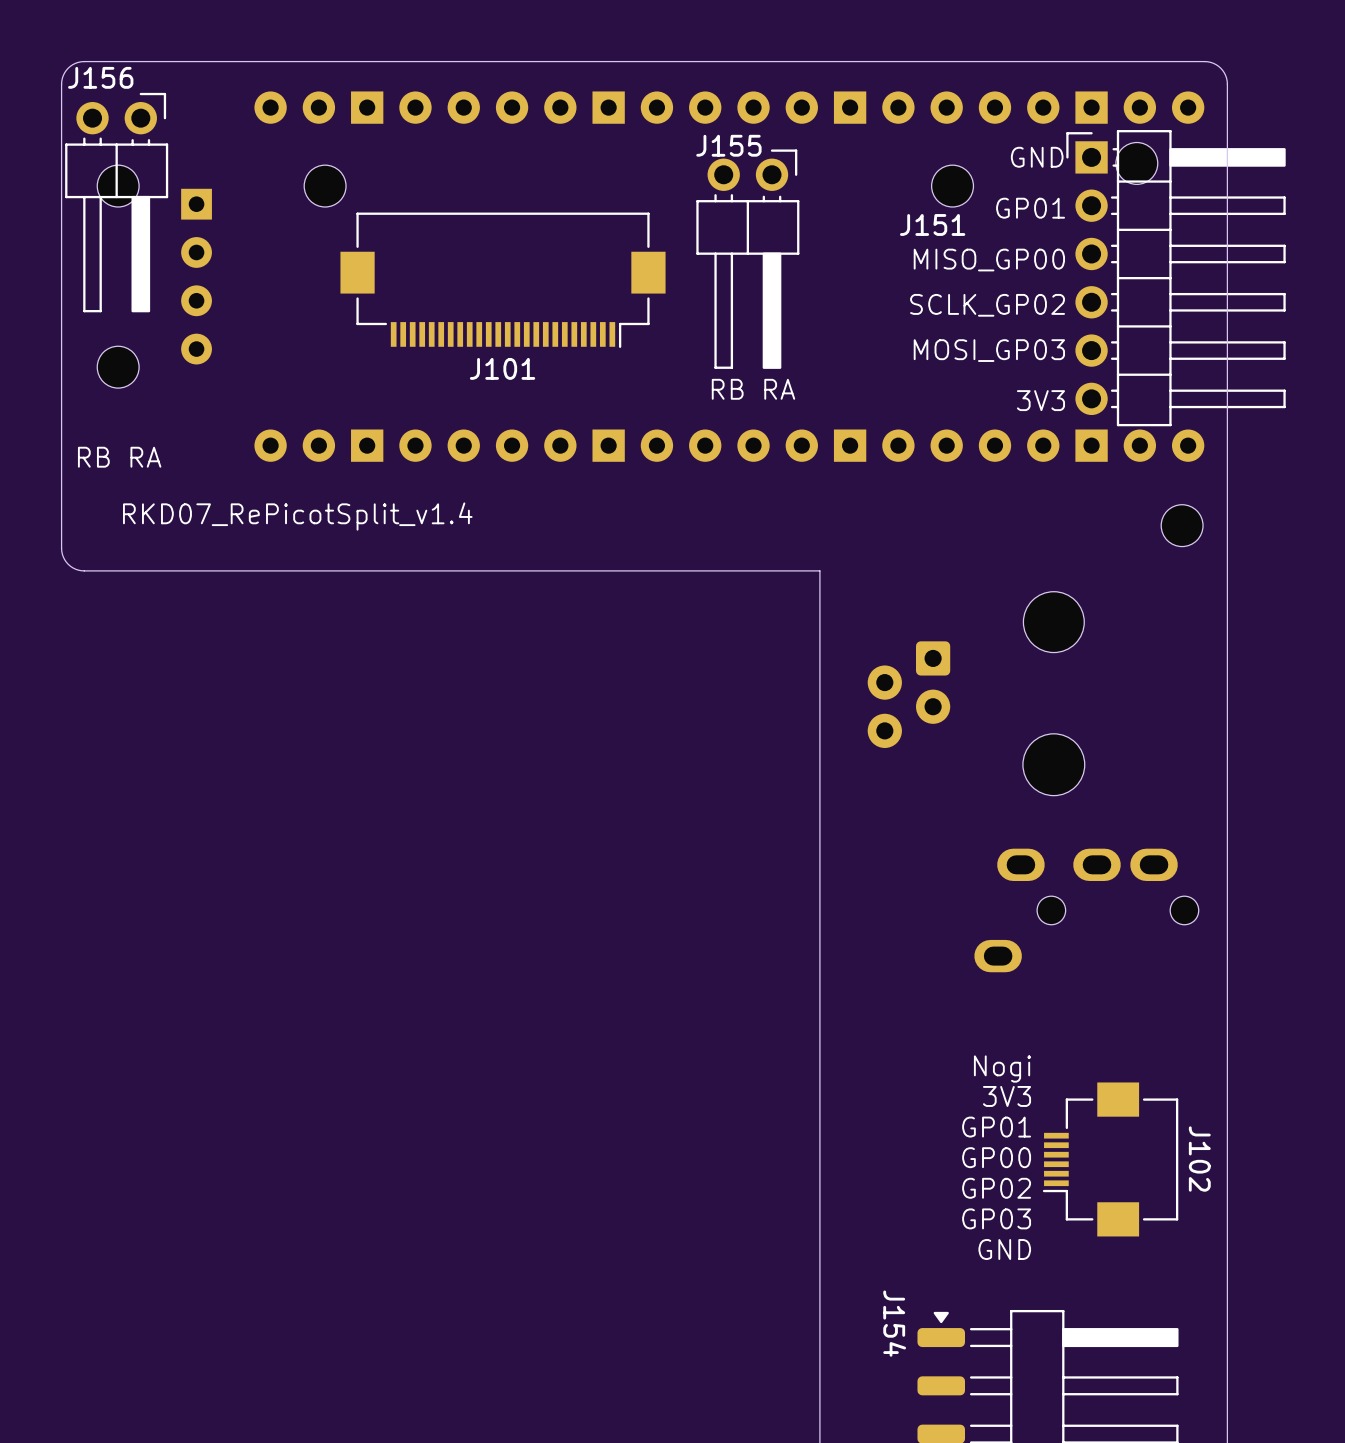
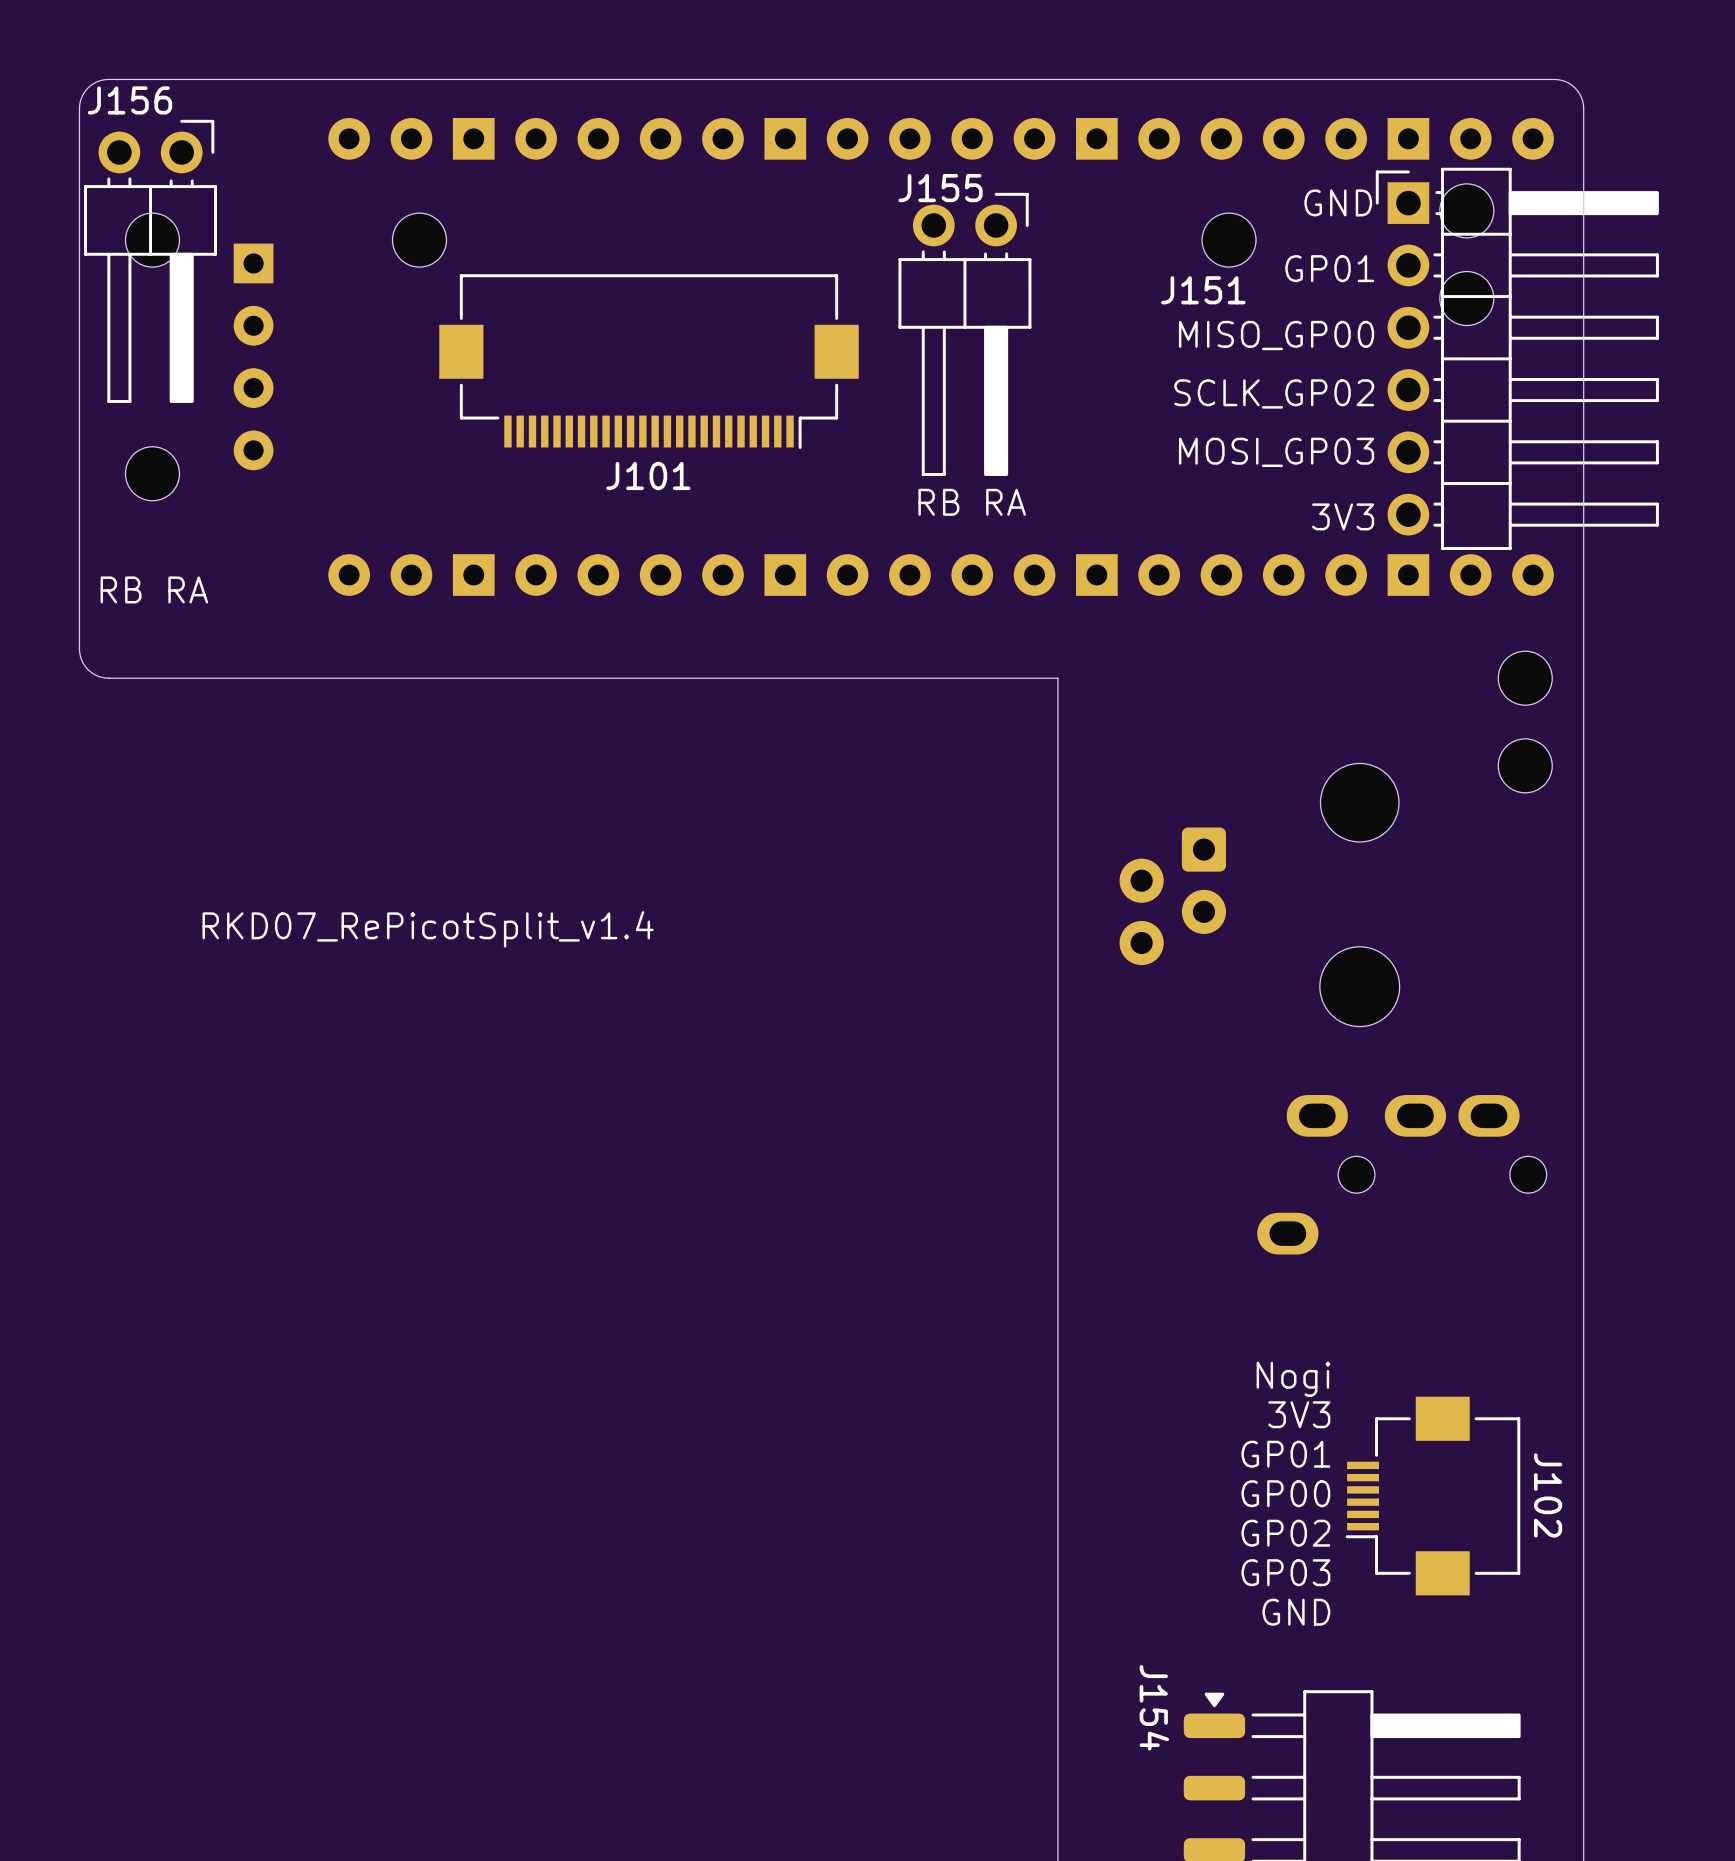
part: none -> (1466, 298)
board edge: (61, 503) (62, 554) (70, 566) (84, 570) -> (79, 649) (81, 660) (88, 669) (97, 675) (108, 678)
text position: RKD07_RePicotSplit_v1.4 (297, 516) -> RKD07_RePicotSplit_v1.4 (428, 929)
board edge: (819, 570) (84, 570) -> (1057, 736) (1057, 678) (108, 678)
part: none -> (1525, 765)

